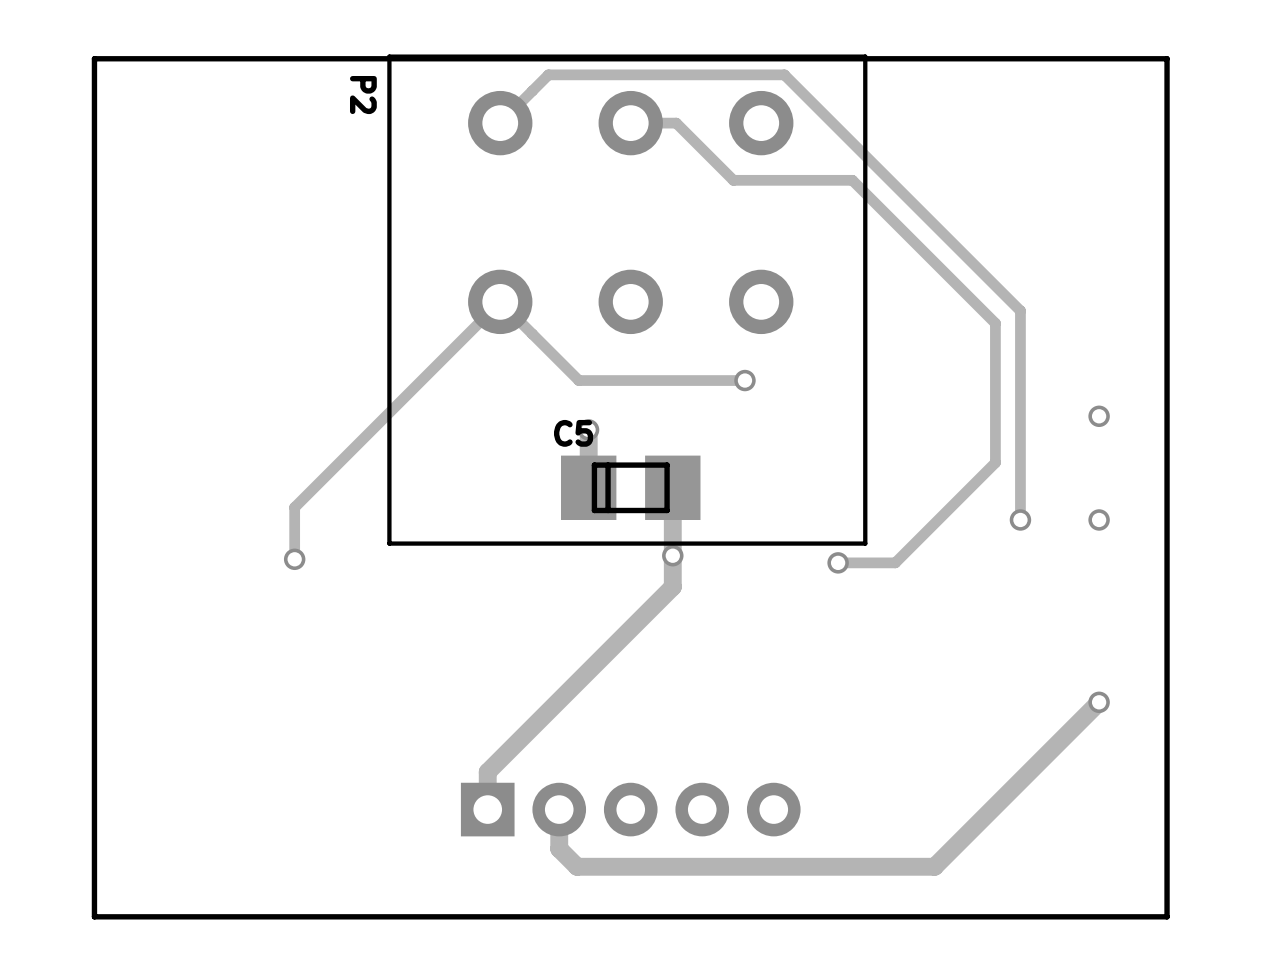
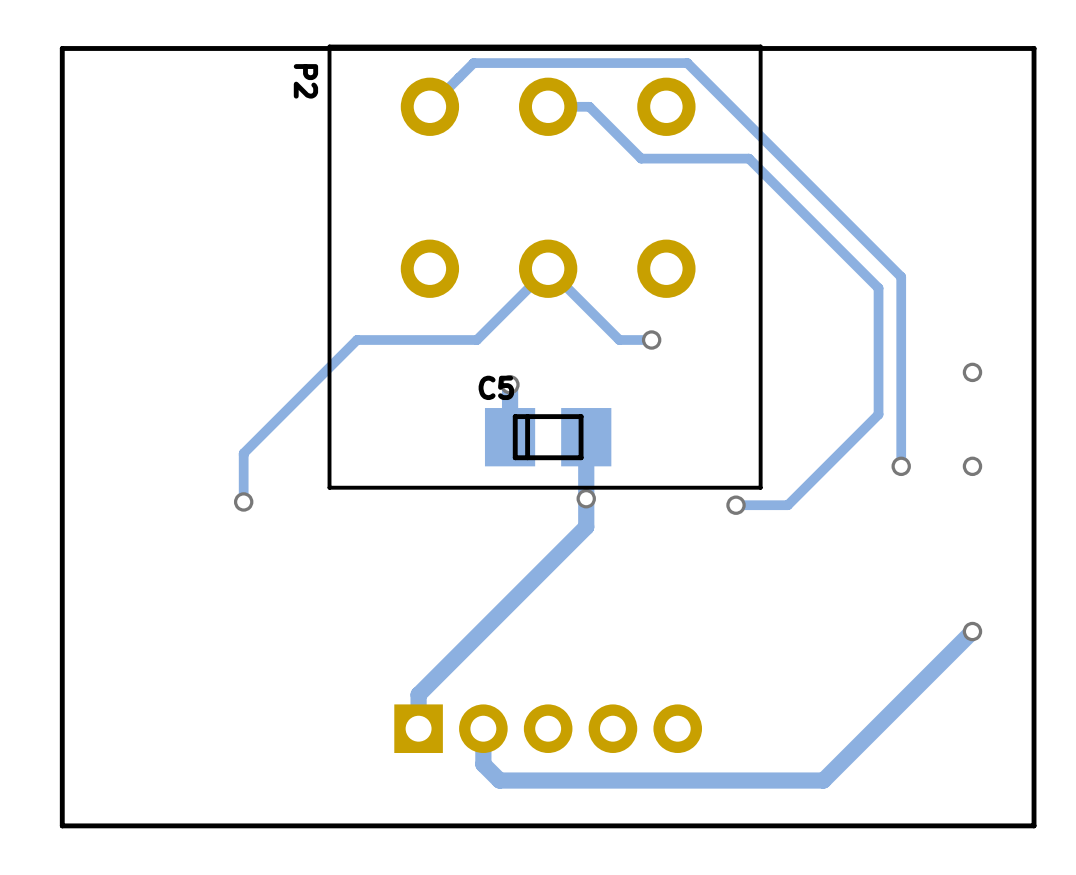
track: (709, 380) (578, 380) (500, 301) (294, 507) -> (619, 340) (548, 268) (476, 340) (357, 340) (243, 455)

